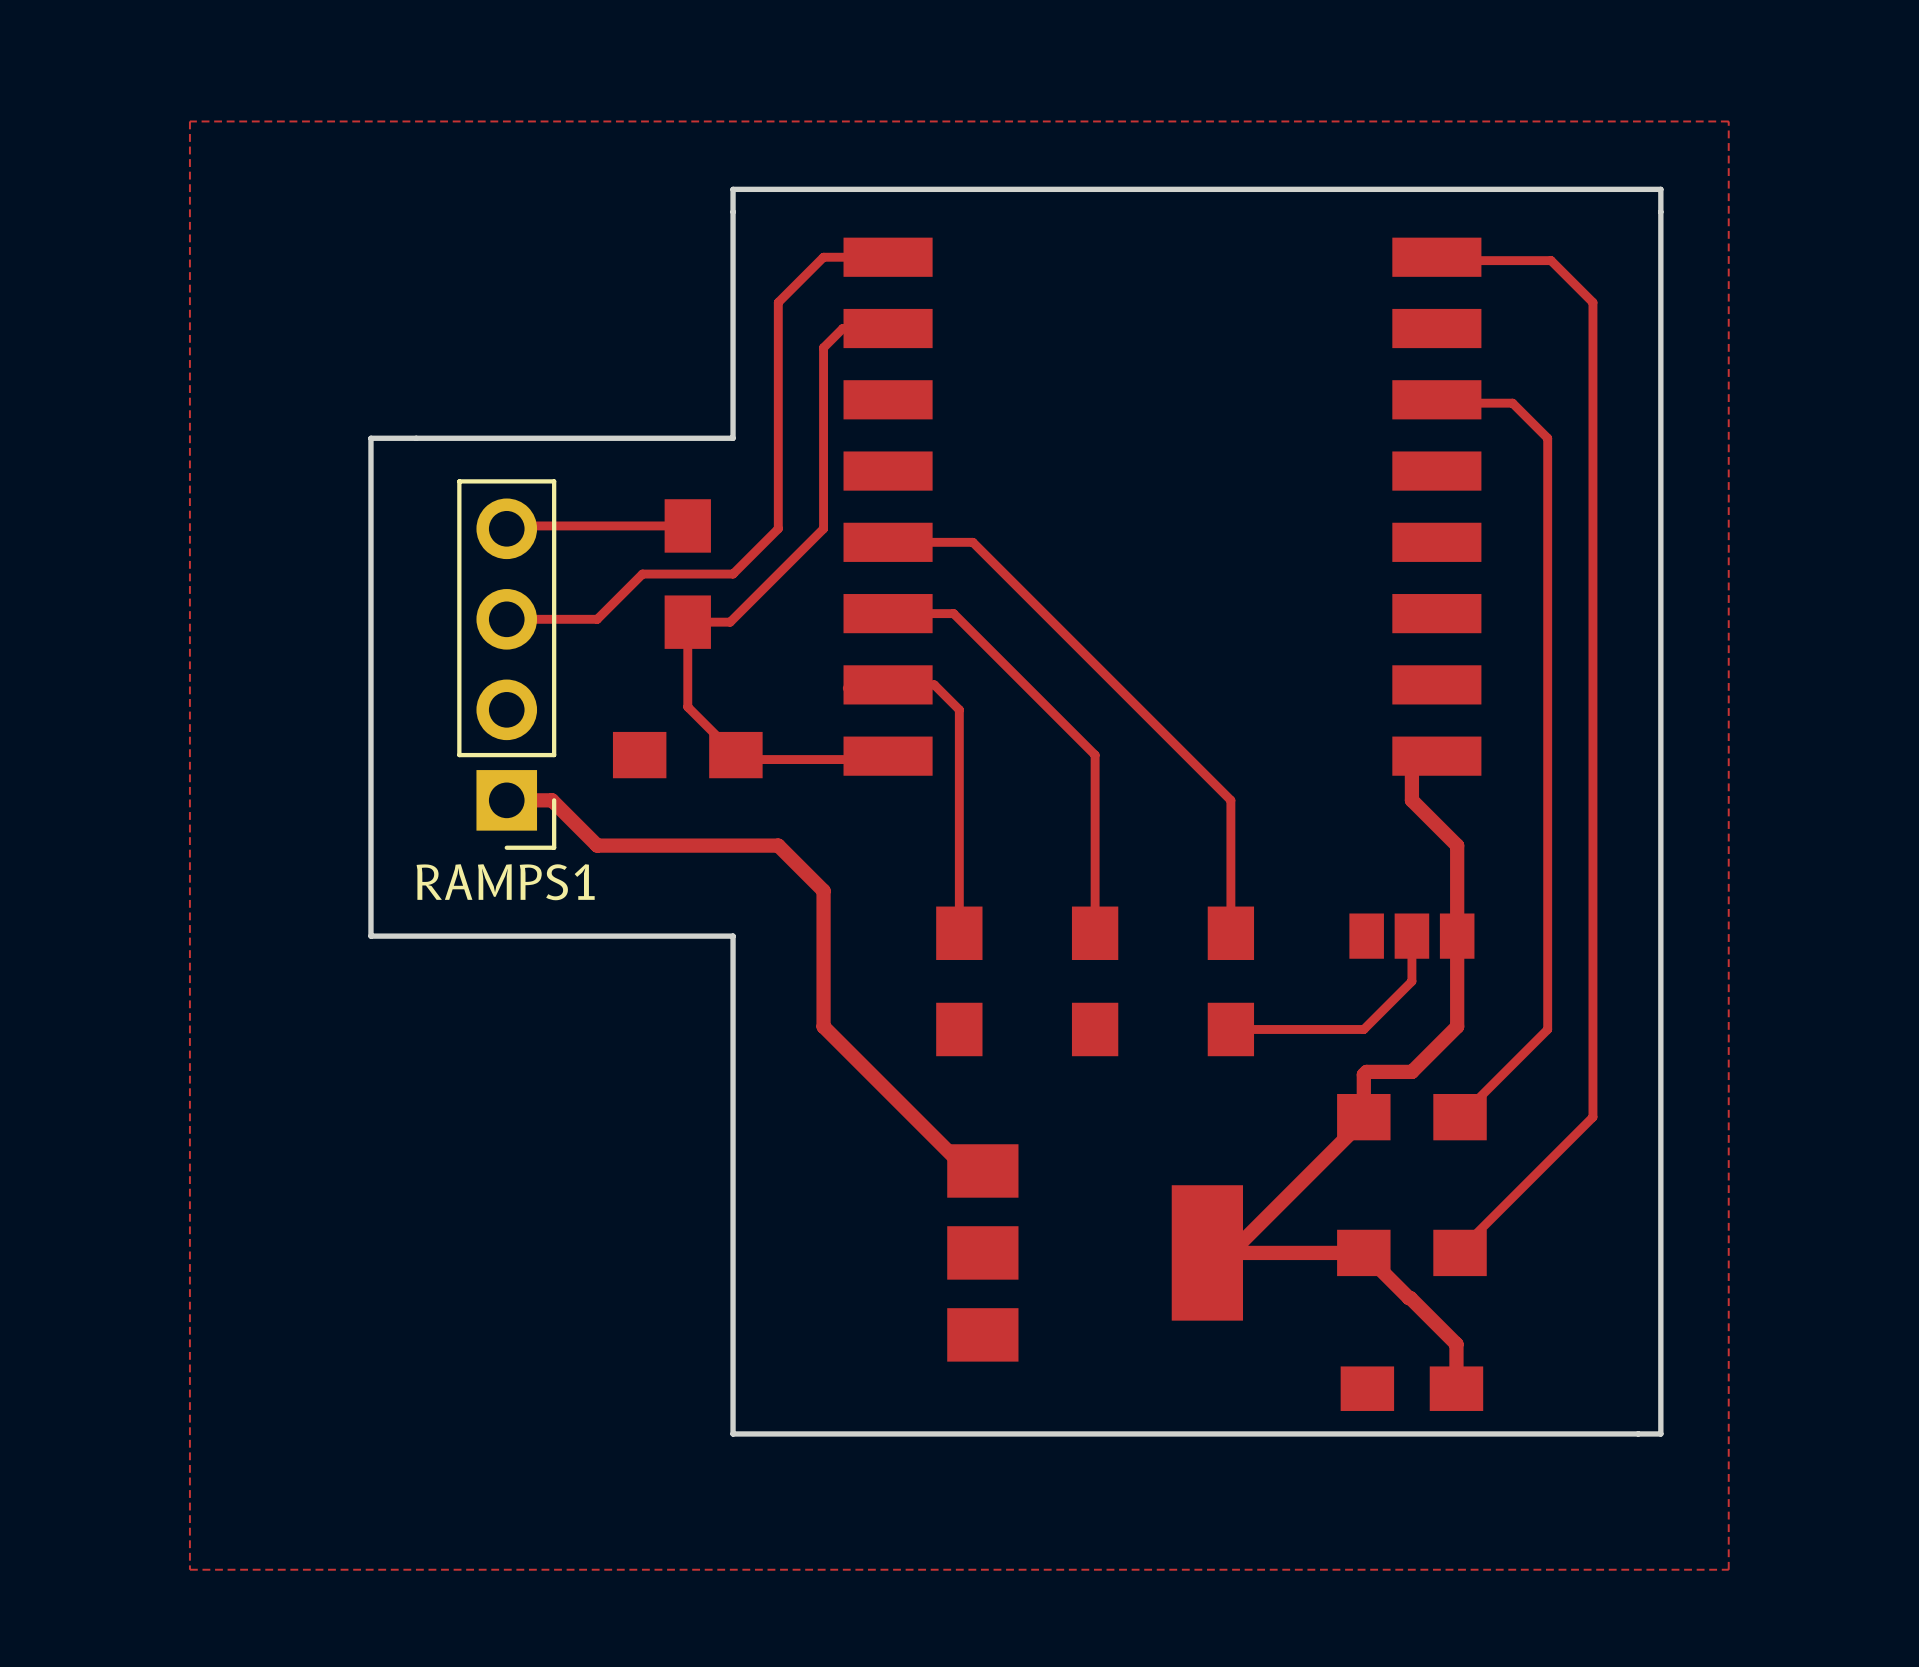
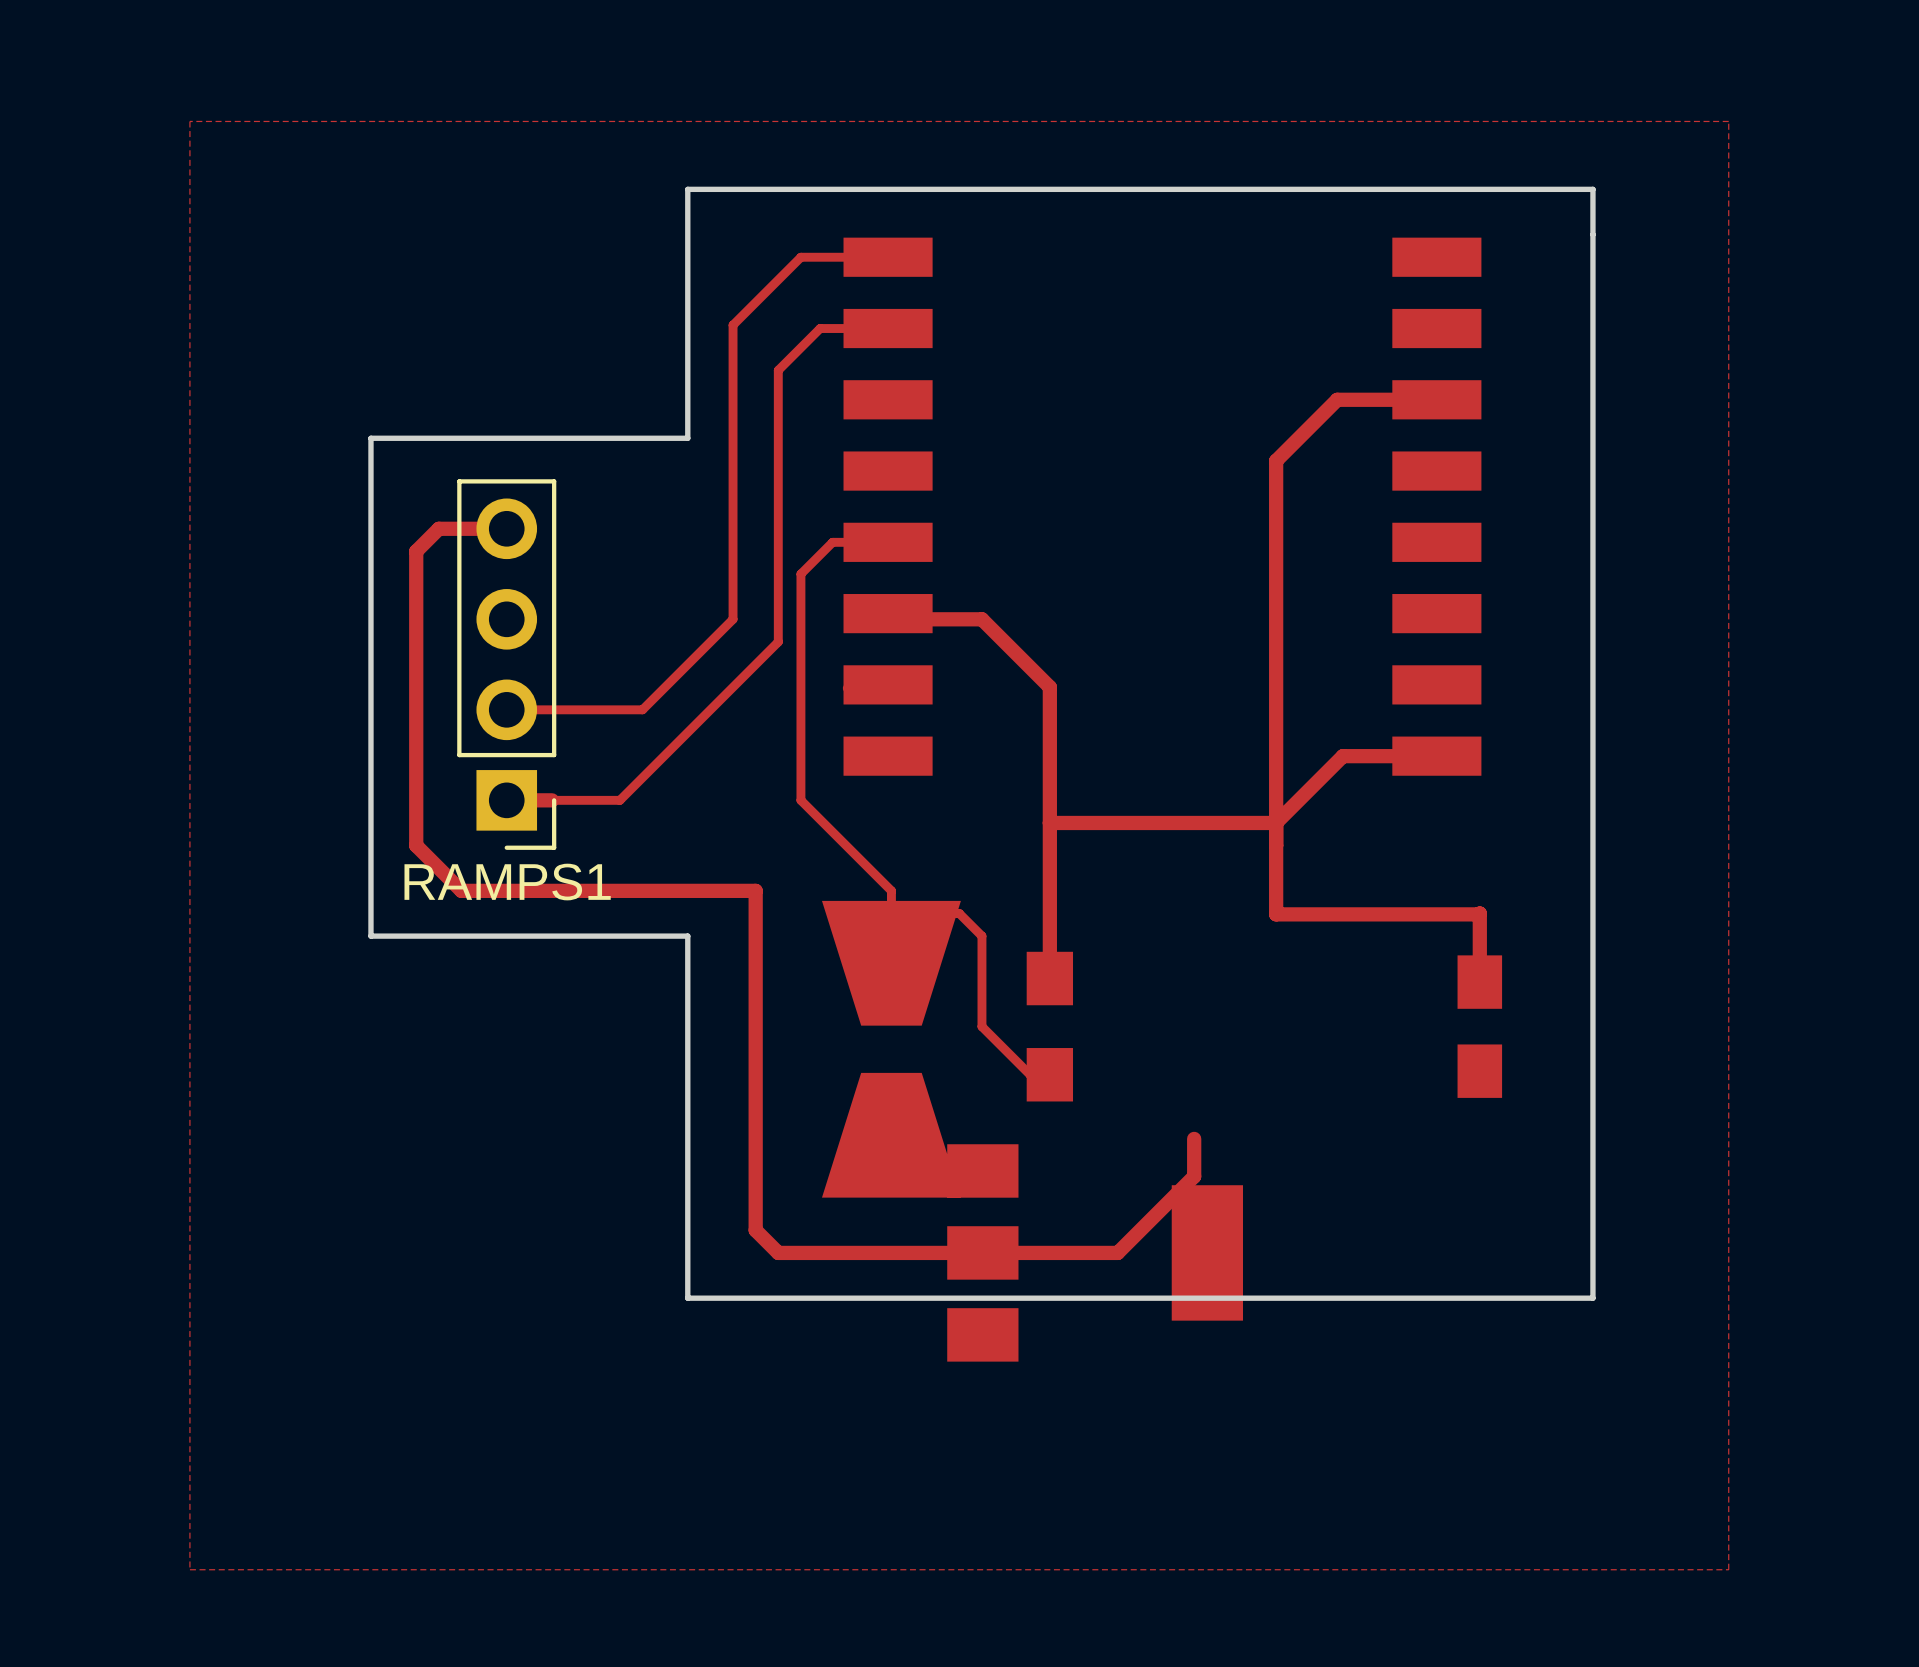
board edge: (733, 189) (733, 438) (687, 438) -> (733, 189) (687, 189) (687, 438)
board edge: (1592, 189) (1660, 189) (1660, 1433) (733, 1433) (733, 936) (687, 936) -> (1592, 189) (1592, 1298) (687, 1298) (687, 936)
top track: (823, 257) (778, 302) (778, 370) -> (842, 328) (820, 328) (778, 370)
top track: (1444, 260) (1551, 260) (1592, 302) (1592, 1117) (1460, 1250) (1460, 1252) -> none
top track: (842, 328) (823, 347) (823, 528) (733, 619) -> (823, 257) (800, 257) (733, 325) (733, 619)
top track: none -> (1411, 399) (1337, 399) (1276, 460) (1276, 914) (1479, 913) (1479, 982)
top track: (1444, 403) (1512, 403) (1547, 438) (1547, 1029) (1460, 1117) -> none
top track: (509, 525) (687, 525) (684, 528) -> none
top track: none -> (506, 528) (438, 528) (416, 551) (416, 845) (461, 890) (755, 890) (755, 1230) (778, 1252) (1117, 1252) (1194, 1176) (1194, 1138)
top track: (778, 528) (733, 574) (642, 574) (597, 619) (506, 619) -> (778, 528) (778, 641) (619, 800) (552, 800)
top track: (913, 542) (972, 542) (1230, 800) (1230, 933) -> (913, 542) (832, 542) (800, 574) (800, 800) (891, 890) (891, 963) (941, 913) (959, 913) (981, 936) (981, 1026) (1030, 1074) (1049, 1074)
part: (687, 574) -> none
top track: (913, 613) (953, 613) (1095, 755) (1095, 933) -> (913, 613) (918, 619) (981, 619) (1049, 687) (1049, 978)
top track: (730, 622) (687, 622) (687, 706) (740, 759) (903, 759) -> (730, 622) (642, 709) (506, 709)
top track: (913, 684) (934, 684) (959, 709) (959, 933) -> none
part: (687, 755) -> none
top track: (1411, 756) (1411, 800) (1457, 845) (1457, 1026) (1411, 1071) (1366, 1071) (1363, 1074) (1363, 1120) (1230, 1252) -> (1411, 756) (1342, 756) (1276, 822) (1049, 822)
top track: (552, 800) (597, 845) (778, 845) (823, 890) (823, 1026) (967, 1170) -> none
top track: (1411, 936) (1411, 981) (1363, 1029) (1230, 1029) -> none
part: (1411, 936) -> none
part: (959, 981) -> none
part: (1095, 981) -> none
part: (1230, 981) -> none
part: none -> (1049, 1026)
part: none -> (891, 1049)
part: (1411, 1117) -> none
top track: (1207, 1252) (1363, 1252) (1456, 1344) (1456, 1388) -> none
part: (1411, 1252) -> none
part rotation: 0° (1411, 1388) -> 90° clockwise (1479, 1026)
part position: (1411, 1388) -> (1479, 1026)

